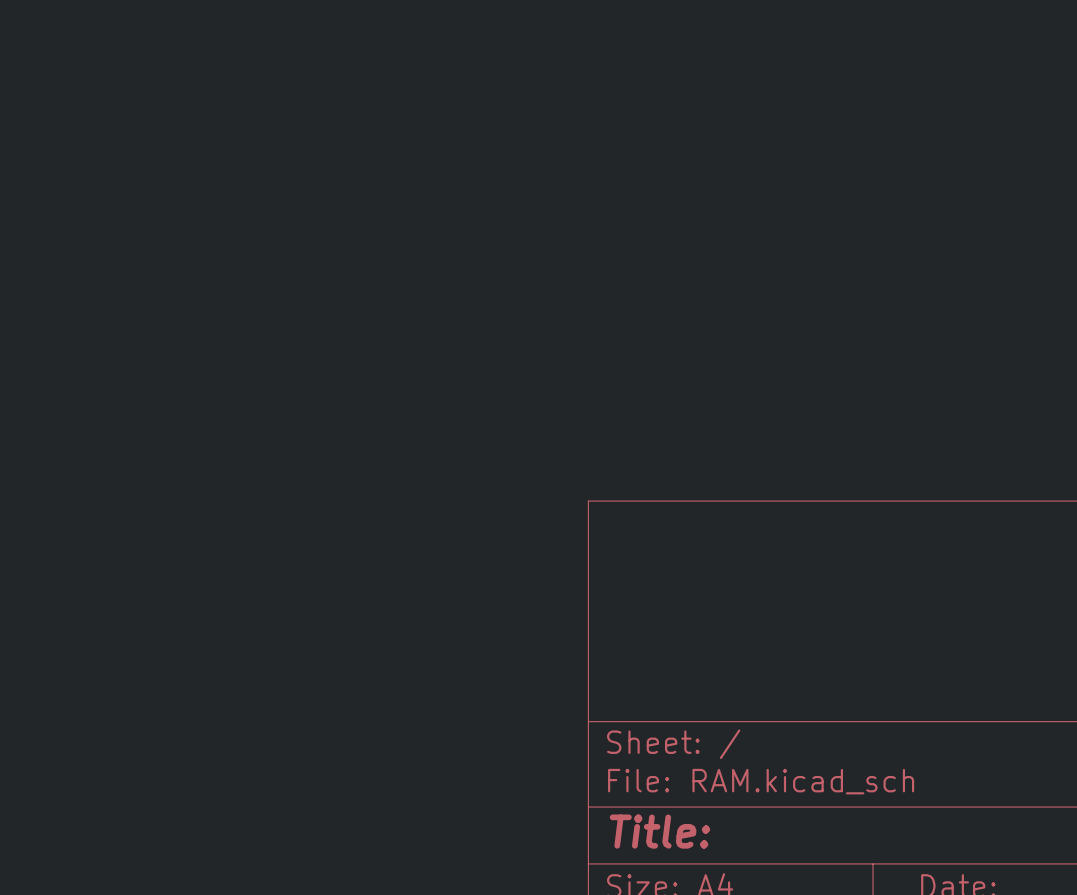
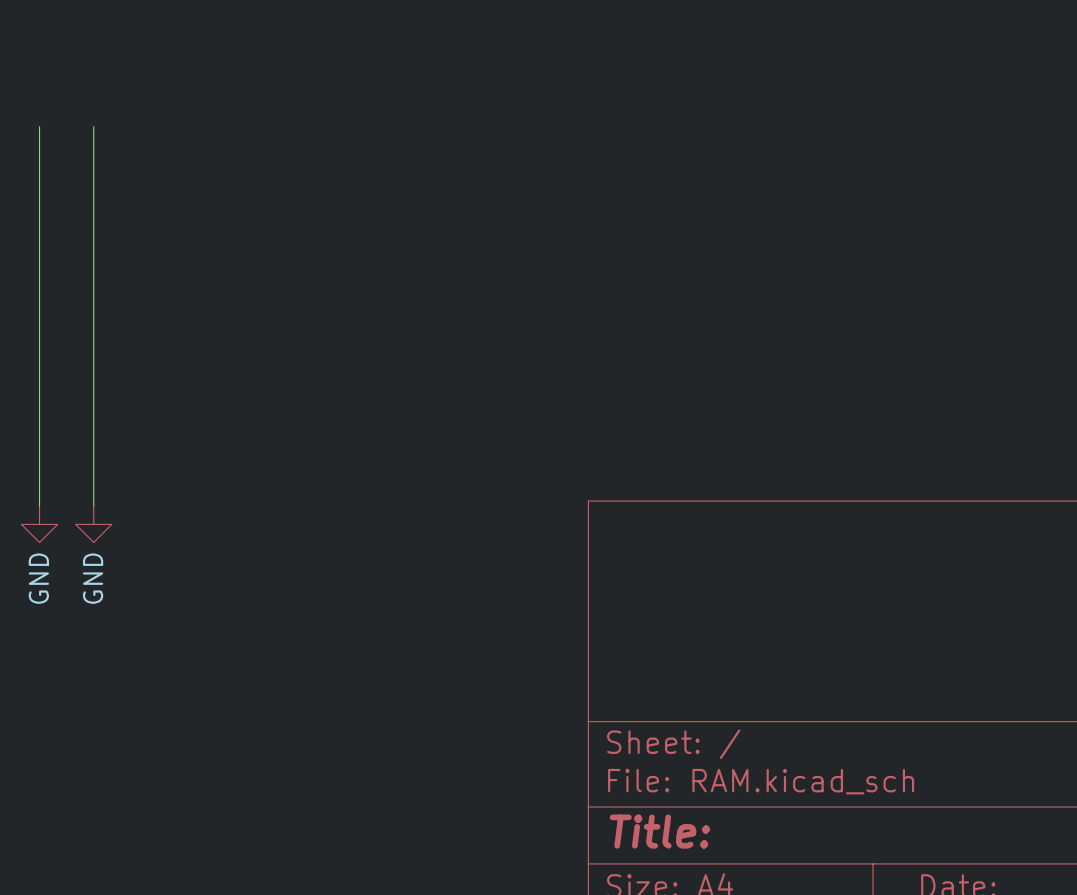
wire: none -> (39, 126) (39, 506)
wire: none -> (93, 126) (93, 506)
power symbol: none -> GND (39, 524)
power symbol: none -> GND (93, 524)

